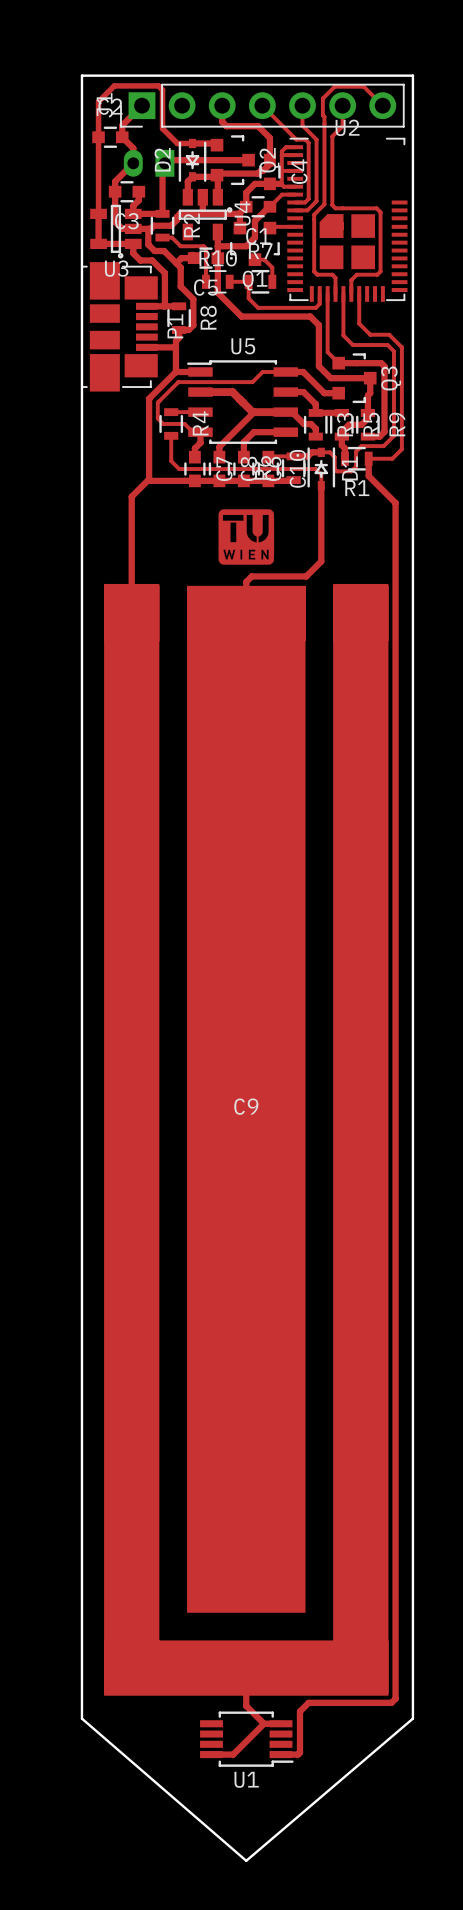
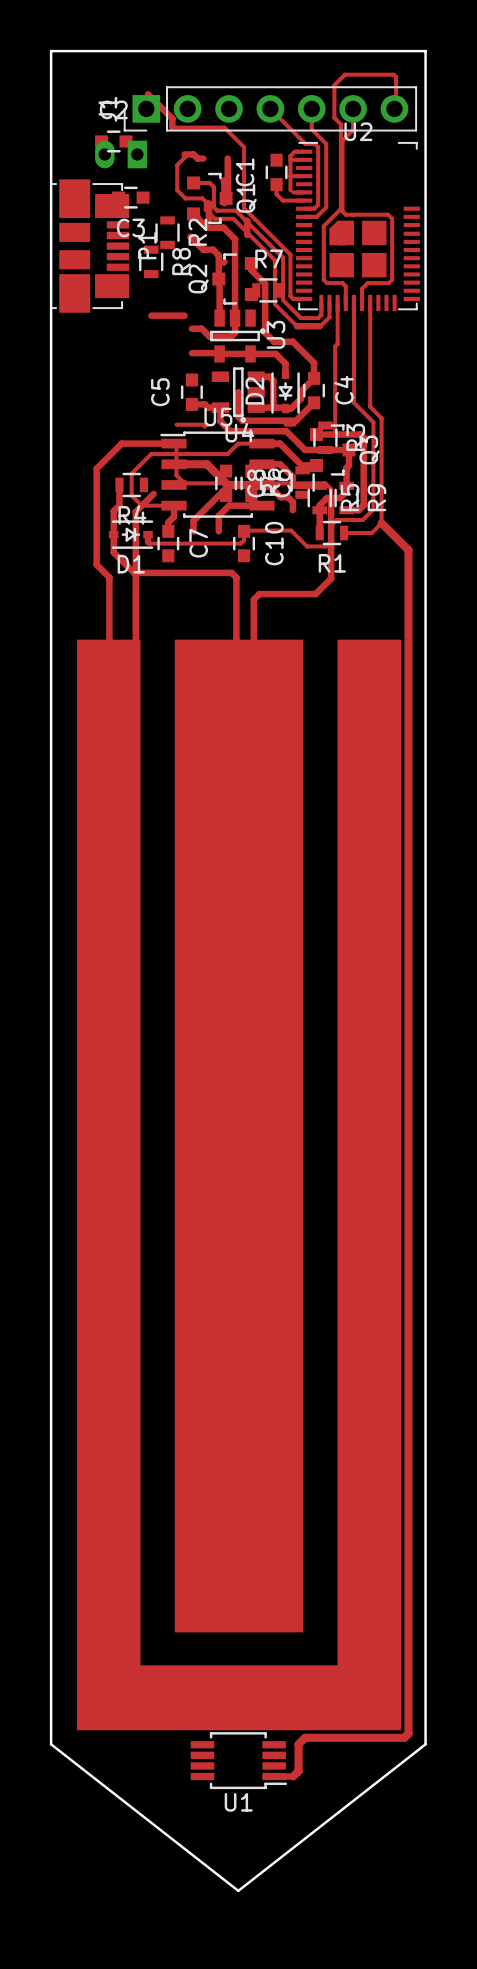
board edge: (412, 75) (81, 75) (81, 1718) (246, 1860) (412, 1718) (412, 1692) -> (425, 77) (425, 51) (51, 51) (51, 1744) (238, 1890) (425, 1744)
track: none -> (147, 94) (172, 118) (172, 127) (224, 127) (244, 147) (244, 208) (290, 254) (290, 296) (293, 298) (304, 298)
track: (142, 105) (122, 125) (122, 137) (133, 148) (133, 163) (115, 181) (115, 221) (122, 228) (150, 228) (153, 225) (171, 225) (179, 213) (239, 213) (246, 206) (246, 192) (254, 183) (281, 183) (284, 186) -> none
track: (222, 105) (222, 121) (226, 126) (258, 126) (269, 138) (269, 164) (258, 173) (218, 173) (215, 176) (192, 176) (187, 181) (187, 197) -> none
track: (382, 105) (363, 86) (334, 86) (322, 98) (324, 204) (314, 214) (314, 219) -> (396, 94) (396, 76) (393, 74) (344, 74) (334, 85) (334, 117) (340, 124) (340, 209) (323, 226)
track: (217, 145) (215, 143) (177, 143) (162, 128) (162, 89) (158, 85) (114, 85) (98, 101) (98, 243) (133, 243) (133, 253) (140, 260) (152, 260) (164, 273) (164, 306) -> none
track: none -> (227, 158) (227, 196) (226, 198)
D2 position: (192, 160) -> (285, 391)
Q2 rotation: 0° (232, 160) -> 180° (235, 279)
Q2 position: (232, 160) -> (235, 279)
track: (248, 160) (168, 160) (162, 165) (162, 213) (133, 213) (133, 205) (138, 200) (138, 191) -> none
part position: (149, 163) -> (121, 154)
C4 position: (269, 172) -> (314, 390)
track: none -> (193, 182) (209, 182) (213, 187) (213, 207) (217, 210) (235, 210) (283, 257) (283, 300) (301, 318) (318, 318) (321, 314) (321, 302)
track: (282, 194) (254, 220) (254, 237) (246, 246) (217, 246) -> (290, 200) (282, 200) (276, 194) (276, 184)
C1 rotation: 0° (258, 206) -> 90° clockwise (276, 172)
C1 position: (258, 206) -> (276, 172)
track: none -> (193, 213) (207, 227) (223, 227) (235, 239) (235, 332) (231, 336) (209, 336) (201, 328) (191, 328)
U4 rotation: 0° (205, 214) -> 90° clockwise (238, 395)
U4 position: (205, 214) -> (238, 395)
track: (295, 226) (269, 228) -> none
track: (148, 228) (148, 244) (154, 251) (164, 251) (180, 267) (180, 286) (193, 299) (193, 325) (188, 329) (179, 329) (179, 337) (175, 341) (175, 372) -> none
track: none -> (190, 236) (203, 249) (213, 249) (218, 255) (219, 318)
U3 rotation: 0° (115, 231) -> 90° counterclockwise (237, 336)
U3 position: (115, 231) -> (237, 336)
track: (217, 232) (217, 292) (241, 316) (288, 316) -> (203, 158) (197, 158) (193, 154) (184, 154) (184, 157) (177, 165) (177, 190) (185, 198) (202, 198) (205, 201) (205, 209) (214, 218) (233, 218) (274, 260) (274, 304) (296, 326)
track: (162, 237) (172, 237) (180, 246) (203, 246) (205, 248) (205, 281) -> none
Q1 rotation: 0° (254, 243) -> 90° counterclockwise (209, 198)
Q1 position: (254, 243) -> (209, 198)
track: none -> (251, 263) (251, 270) (265, 283) (265, 332) (274, 341) (292, 341) (314, 362) (314, 378) (301, 391) (301, 398) (291, 408) (256, 407)
track: (194, 258) (181, 258) (176, 263) -> none
C5 rotation: 0° (205, 258) -> 90° clockwise (191, 392)
C5 position: (205, 258) -> (191, 392)
track: (254, 259) (264, 259) (272, 267) (272, 281) -> none
R10: (217, 281) -> none
track: (229, 281) (248, 281) (248, 298) (258, 307) (315, 307) (319, 303) -> (319, 326) (329, 317) (329, 313)
track: (310, 316) (318, 325) (318, 366) (330, 378) (370, 378) (367, 418) (361, 424) (348, 424) (341, 431) (341, 445) (345, 448) (345, 458) -> none
R8 position: (179, 318) -> (151, 261)
track: (359, 323) (370, 334) (389, 334) (401, 347) (401, 449) (392, 458) (368, 458) (368, 476) (395, 502) (395, 1698) (391, 1702) (308, 1702) (299, 1711) (299, 1752) (298, 1754) (281, 1754) -> (370, 333) (370, 406) (381, 418) (381, 523)
P1 position: (119, 326) -> (90, 246)
track: (327, 333) (327, 352) (338, 363) (381, 363) (384, 366) (384, 431) (379, 436) (367, 436) -> (337, 344) (335, 346) (335, 434)
track: (343, 335) (352, 345) (387, 345) (393, 351) (393, 435) (383, 446) (361, 446) (356, 451) (356, 466) (351, 471) (337, 471) (334, 469) (334, 457) (329, 452) (311, 452) (307, 456) (268, 457) -> (353, 345) (353, 402) (373, 422) (373, 509) (362, 519) (336, 519) (331, 524) (331, 540) (325, 546) (307, 546) (291, 530) (244, 530) (244, 540) (240, 543) (149, 543) (148, 534)
track: none -> (191, 353) (275, 353) (285, 363) (285, 374)
track: (146, 347) (175, 347) -> none
track: none -> (256, 376) (269, 376) (273, 380) (273, 407)
track: (198, 370) (200, 372) (175, 372) (149, 398) (149, 480) -> none
Q3 position: (354, 378) -> (332, 449)
track: none -> (238, 392) (238, 416) (242, 420) (296, 420) (314, 402)
track: none -> (191, 404) (220, 407) (220, 421) (230, 431) (286, 431) (305, 449) (349, 449) (346, 491) (340, 498) (327, 498) (319, 505) (319, 533)
track: (200, 392) (232, 392) (252, 412) (293, 412) -> (174, 464) (207, 464) (227, 484) (270, 484)
track: (285, 392) (303, 392) (315, 404) (315, 412) (341, 412) -> (261, 464) (280, 464) (292, 476) (292, 485) (319, 485)
track: (338, 393) (324, 393) (303, 372) (262, 372) (252, 382) (178, 382) (157, 402) (157, 418) (163, 423) (184, 423) (192, 432) (200, 432) (200, 442) (194, 448) (194, 457) -> none
U5 position: (242, 402) -> (217, 474)
track: (254, 412) (219, 446) (219, 457) -> (229, 484) (193, 520) (193, 531)
track: (292, 412) (303, 423) (311, 423) (315, 428) (315, 436) -> (268, 484) (280, 497) (287, 497) (292, 502) (292, 510)
track: none -> (316, 434) (360, 434) (363, 437) (363, 505) (358, 510) (346, 510)
R4 rotation: 0° (171, 423) -> 90° clockwise (131, 484)
R4 position: (171, 423) -> (131, 484)
R5 position: (341, 424) -> (319, 498)
R9 position: (367, 424) -> (346, 498)
track: none -> (172, 441) (174, 443) (121, 443) (96, 468) (96, 564) (109, 577) (109, 670)
track: (285, 432) (253, 432) (243, 442) (243, 457) -> (261, 505) (229, 505) (218, 515) (218, 531)
track: none -> (316, 465) (301, 465) (279, 443) (238, 443) (227, 454) (151, 454) (131, 473) (131, 495) (141, 505) (174, 505) (174, 516) (168, 522) (168, 531)
R1 position: (356, 458) -> (331, 533)
D1 rotation: 0° (321, 468) -> 90° clockwise (131, 534)
D1 position: (321, 468) -> (131, 534)
C7 position: (194, 469) -> (168, 543)
C10 position: (268, 469) -> (244, 543)
track: none -> (119, 484) (119, 505) (113, 511) (113, 552) (134, 572) (231, 572) (236, 577) (236, 671)
track: (293, 480) (149, 480) -> none
track: none -> (381, 523) (371, 533) (344, 533)
track: none -> (381, 523) (408, 550) (408, 1733) (404, 1737) (305, 1737) (298, 1744) (298, 1771) (293, 1776) (289, 1776)
drawing: [218, 509, 275, 565] -> none
C9: (246, 1139) -> none
part: none -> (239, 1184)
track: (246, 1668) (246, 1705) (264, 1723) (233, 1754) (211, 1754) -> none
U1 position: (246, 1739) -> (238, 1760)

